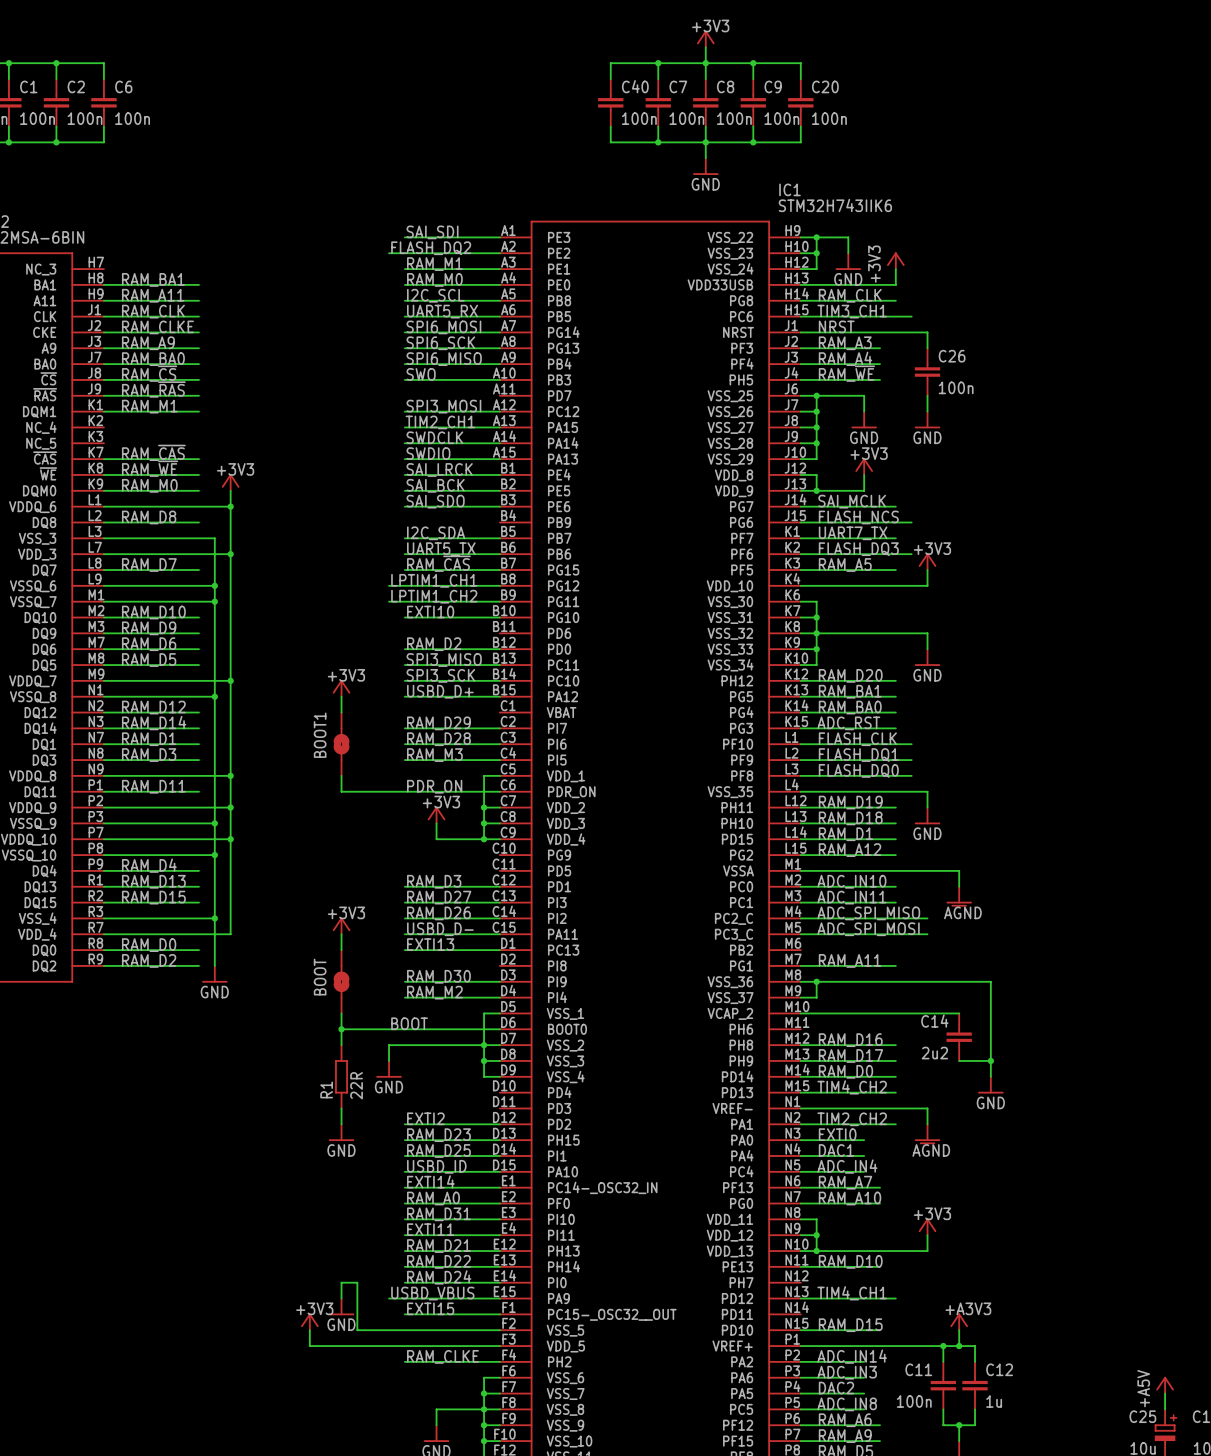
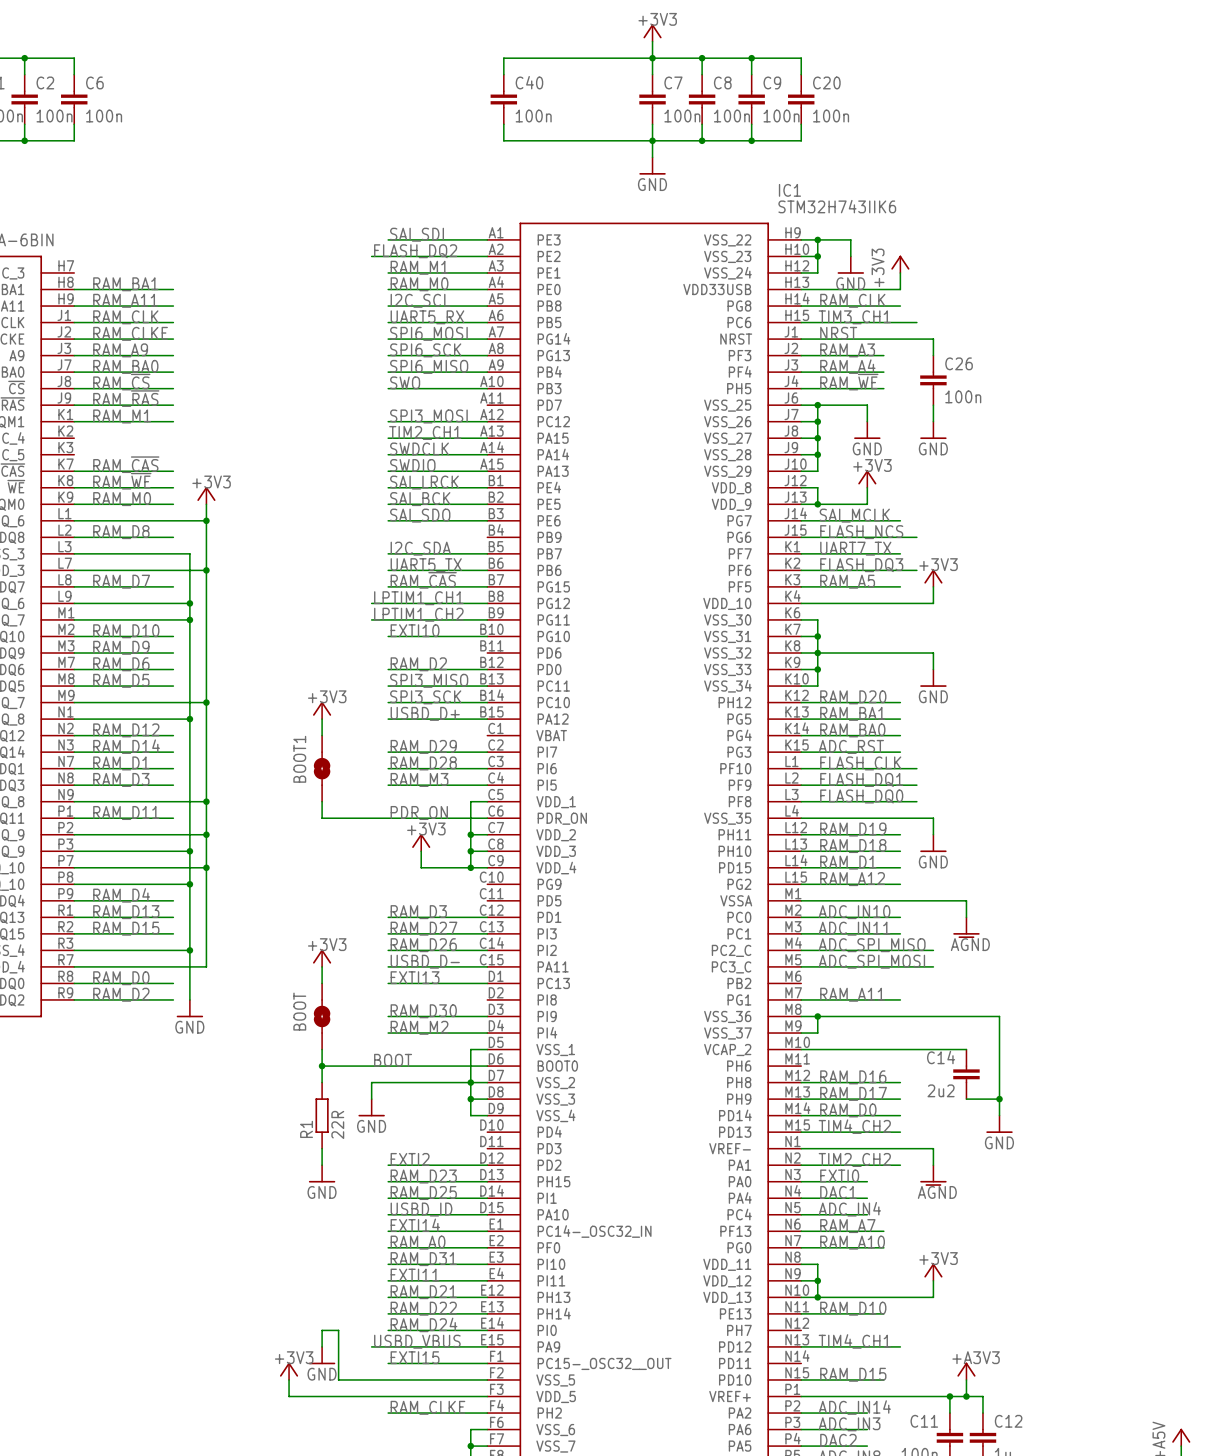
power symbol position: +3V3 (705, 39) -> +3V3 (652, 32)
wire: (705, 47) (705, 63) -> (652, 41) (652, 58)
wire: (610, 63) (610, 79) -> (602, 58) (503, 58) (503, 74)
C40 position: (610, 102) -> (503, 99)
wire: (610, 126) (610, 142) -> (503, 124) (503, 140) (602, 140)
wire: (705, 142) (705, 158) -> (652, 140) (652, 157)
power symbol position: GND (705, 166) -> GND (652, 166)

